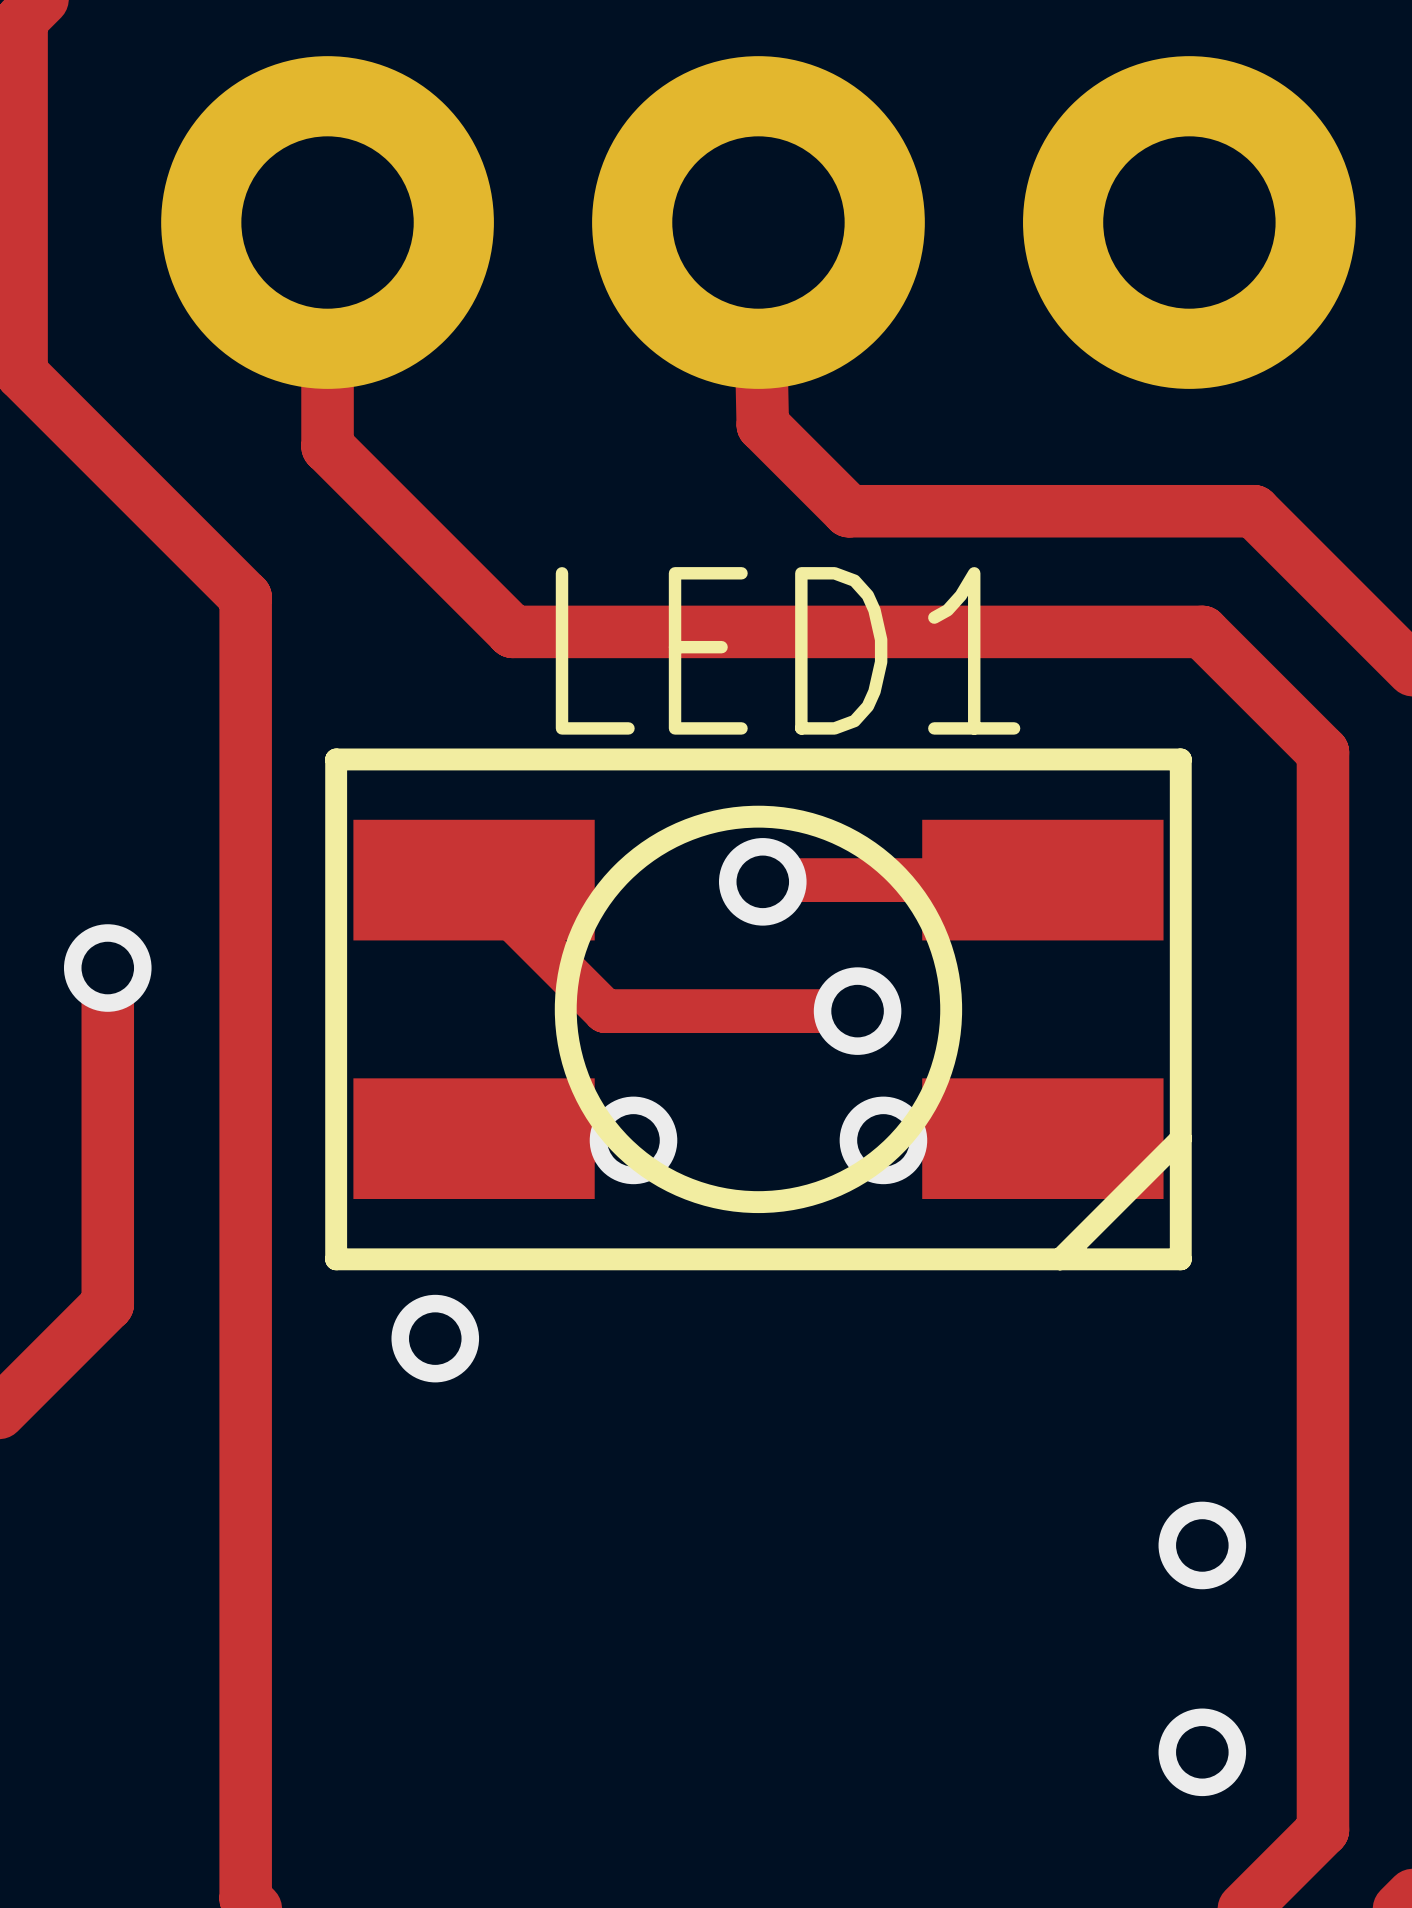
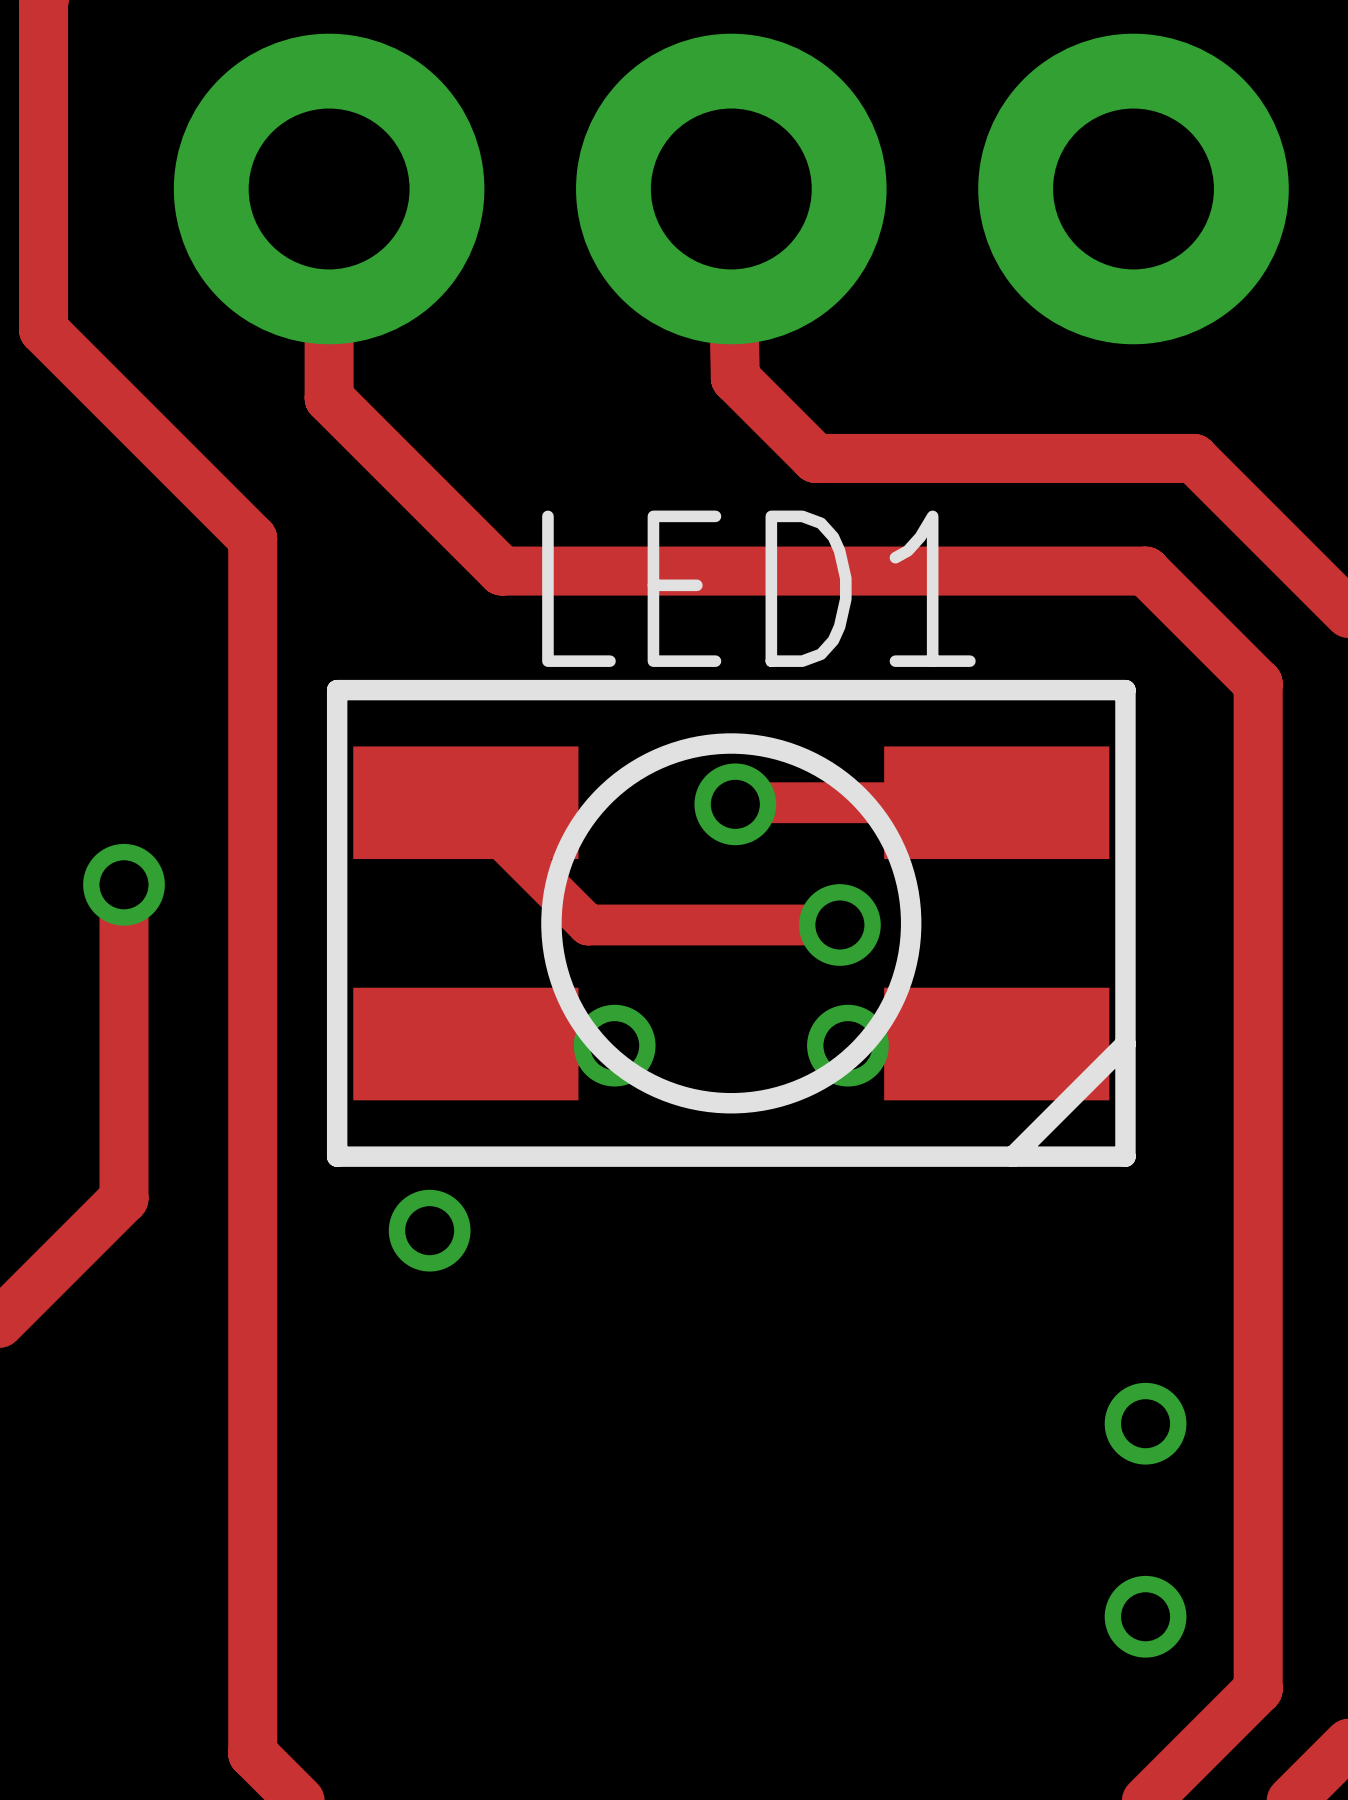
via position: (857, 1011) -> (839, 924)

